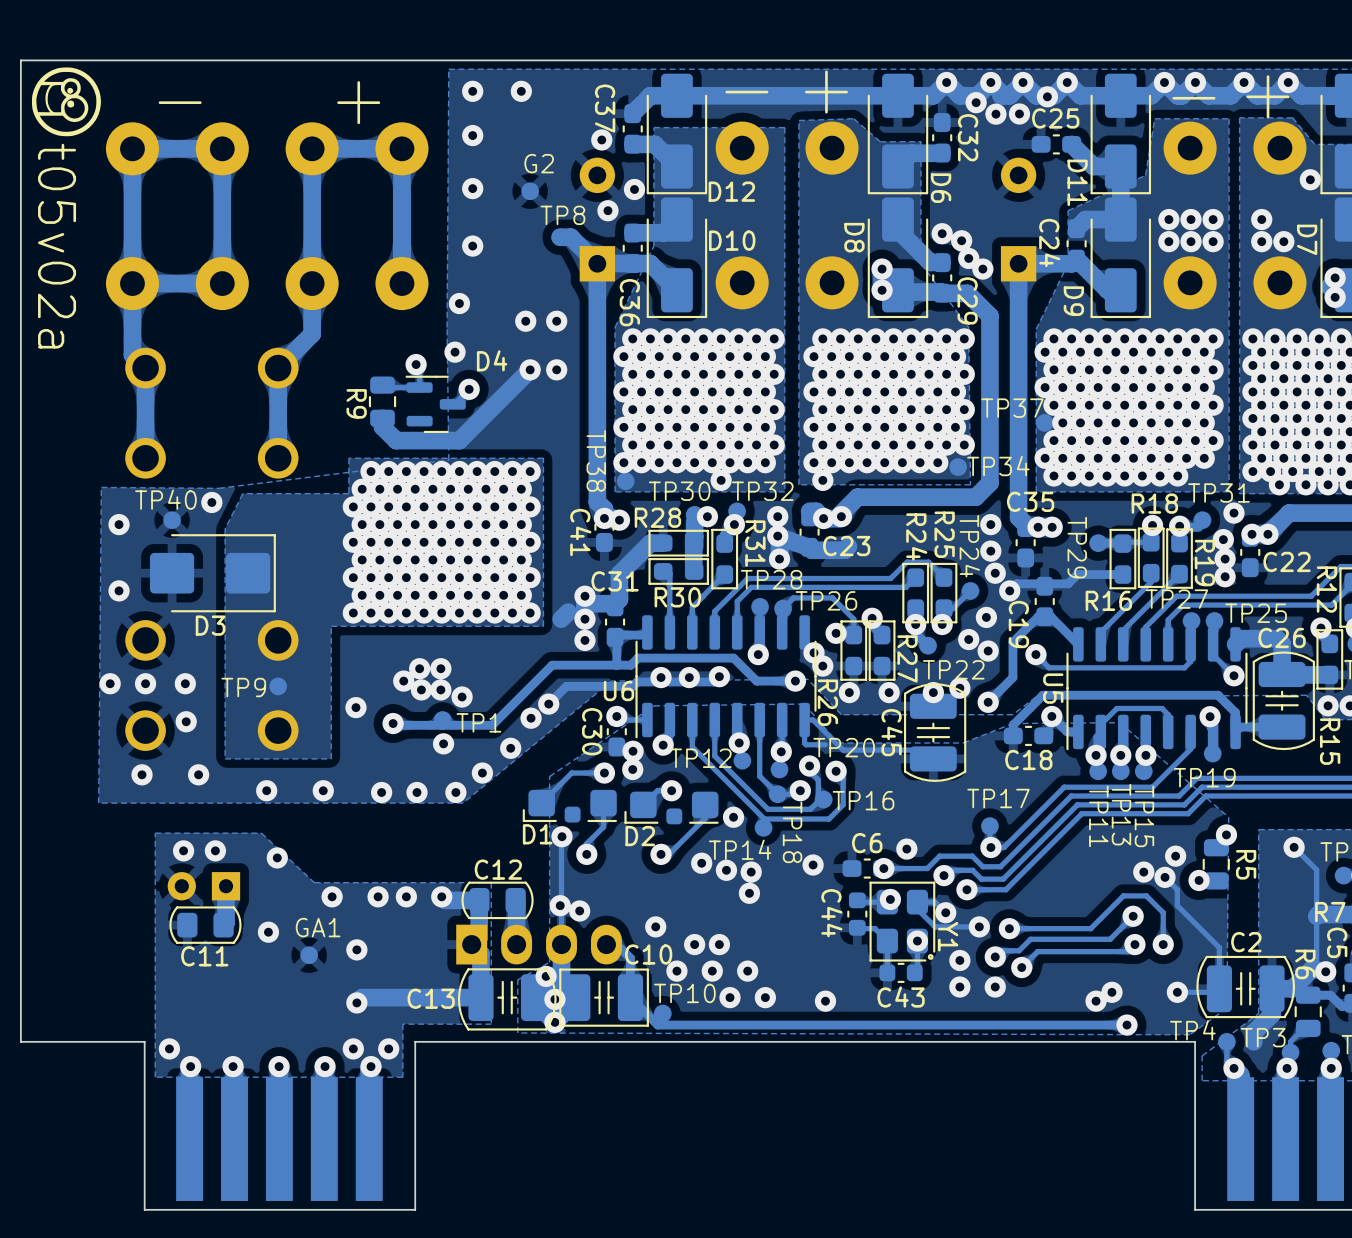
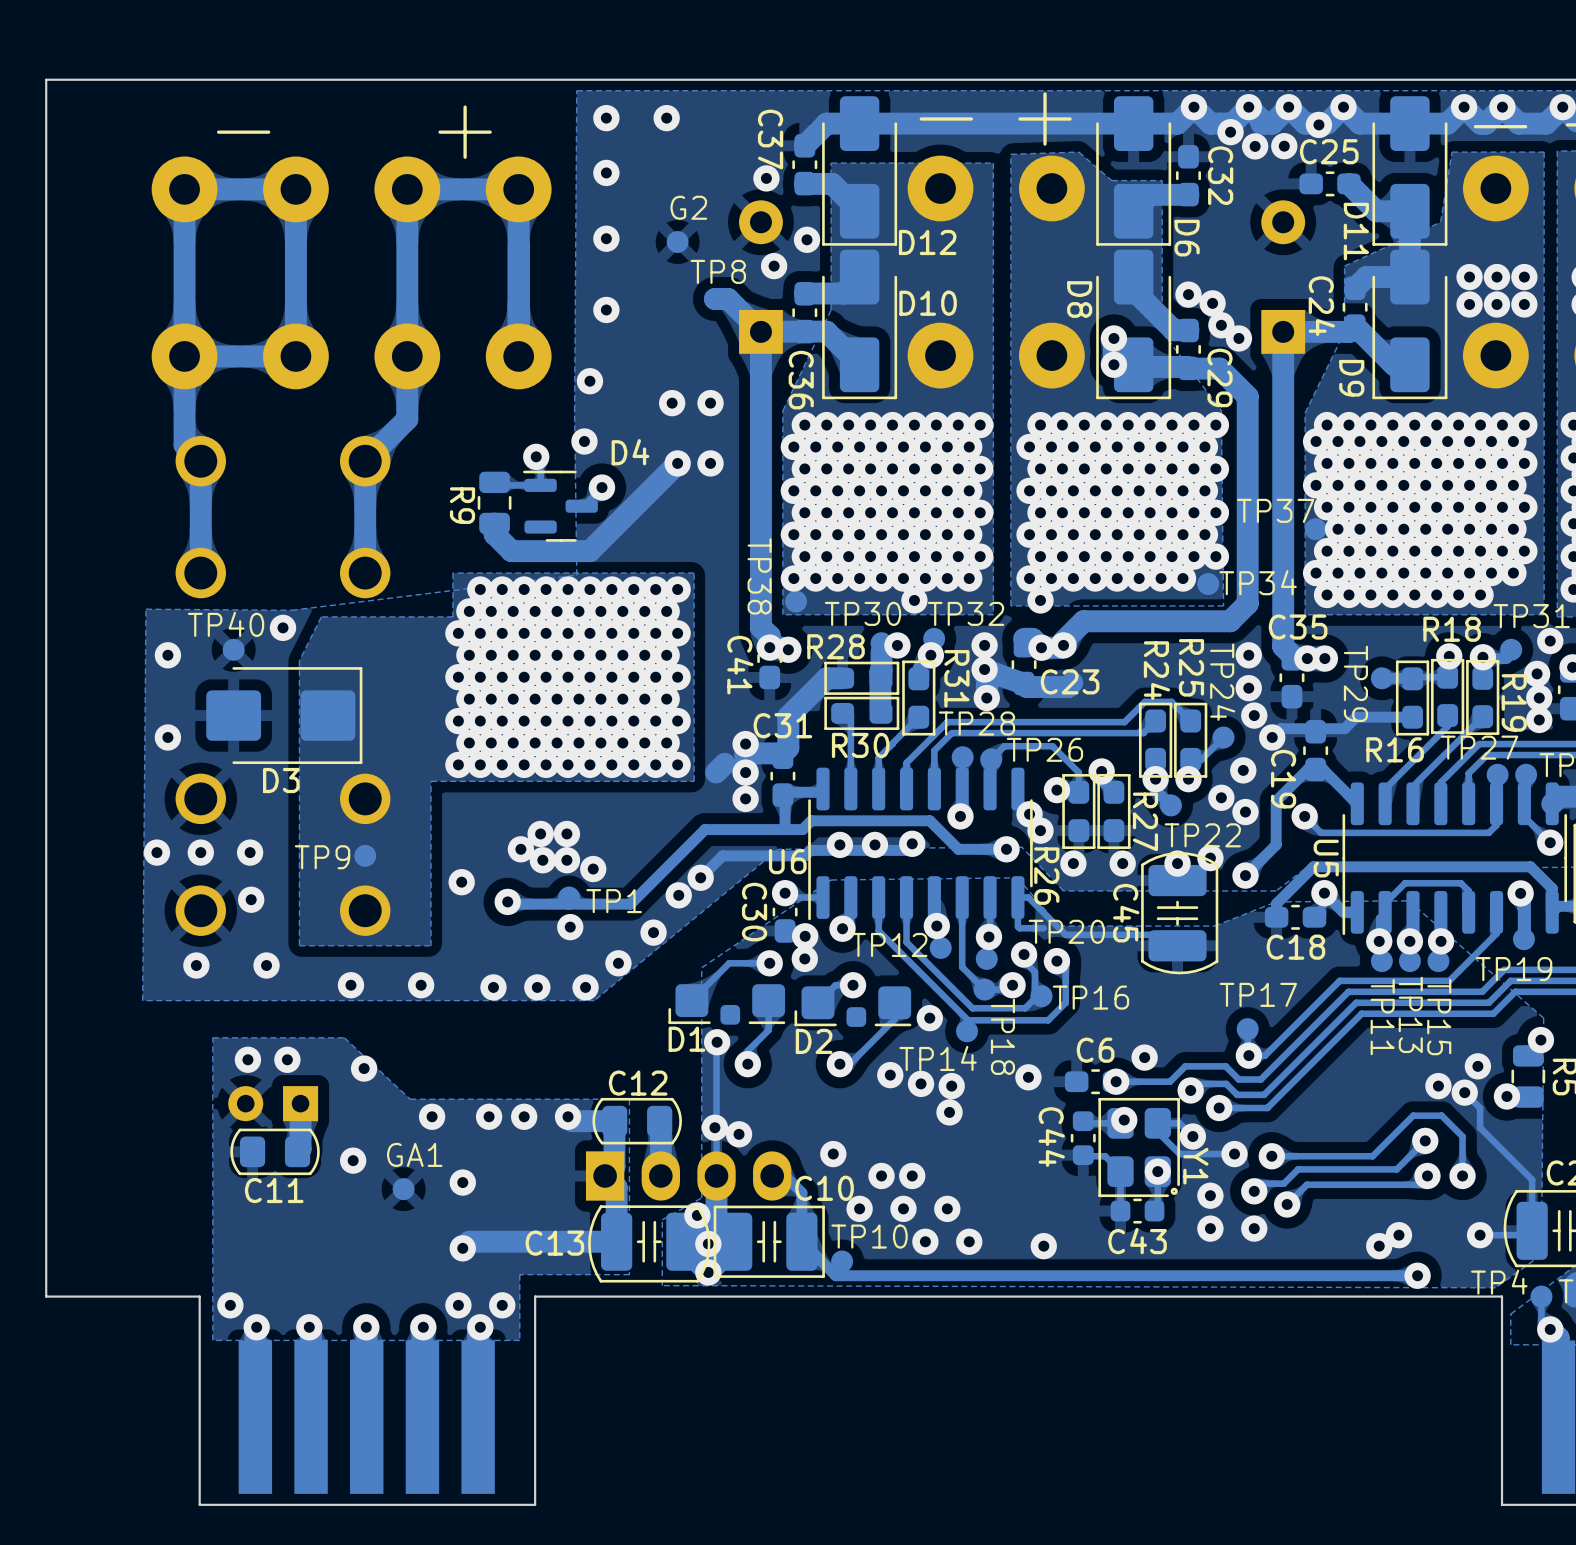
drawing: [31, 67, 101, 137] -> none
text: t05v02a (57, 246) -> none

